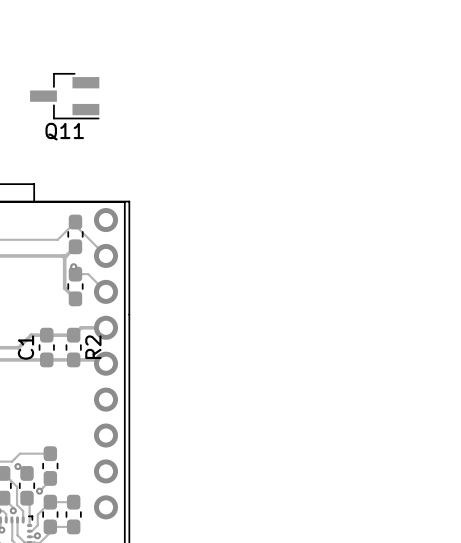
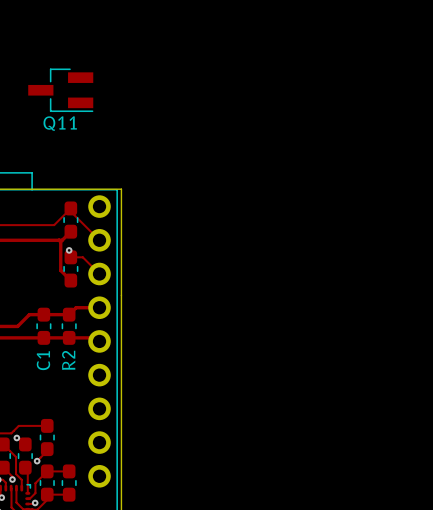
C1 name position: C1 (25, 347) -> C1 (43, 360)
R2 name position: R2 (93, 347) -> R2 (68, 360)

